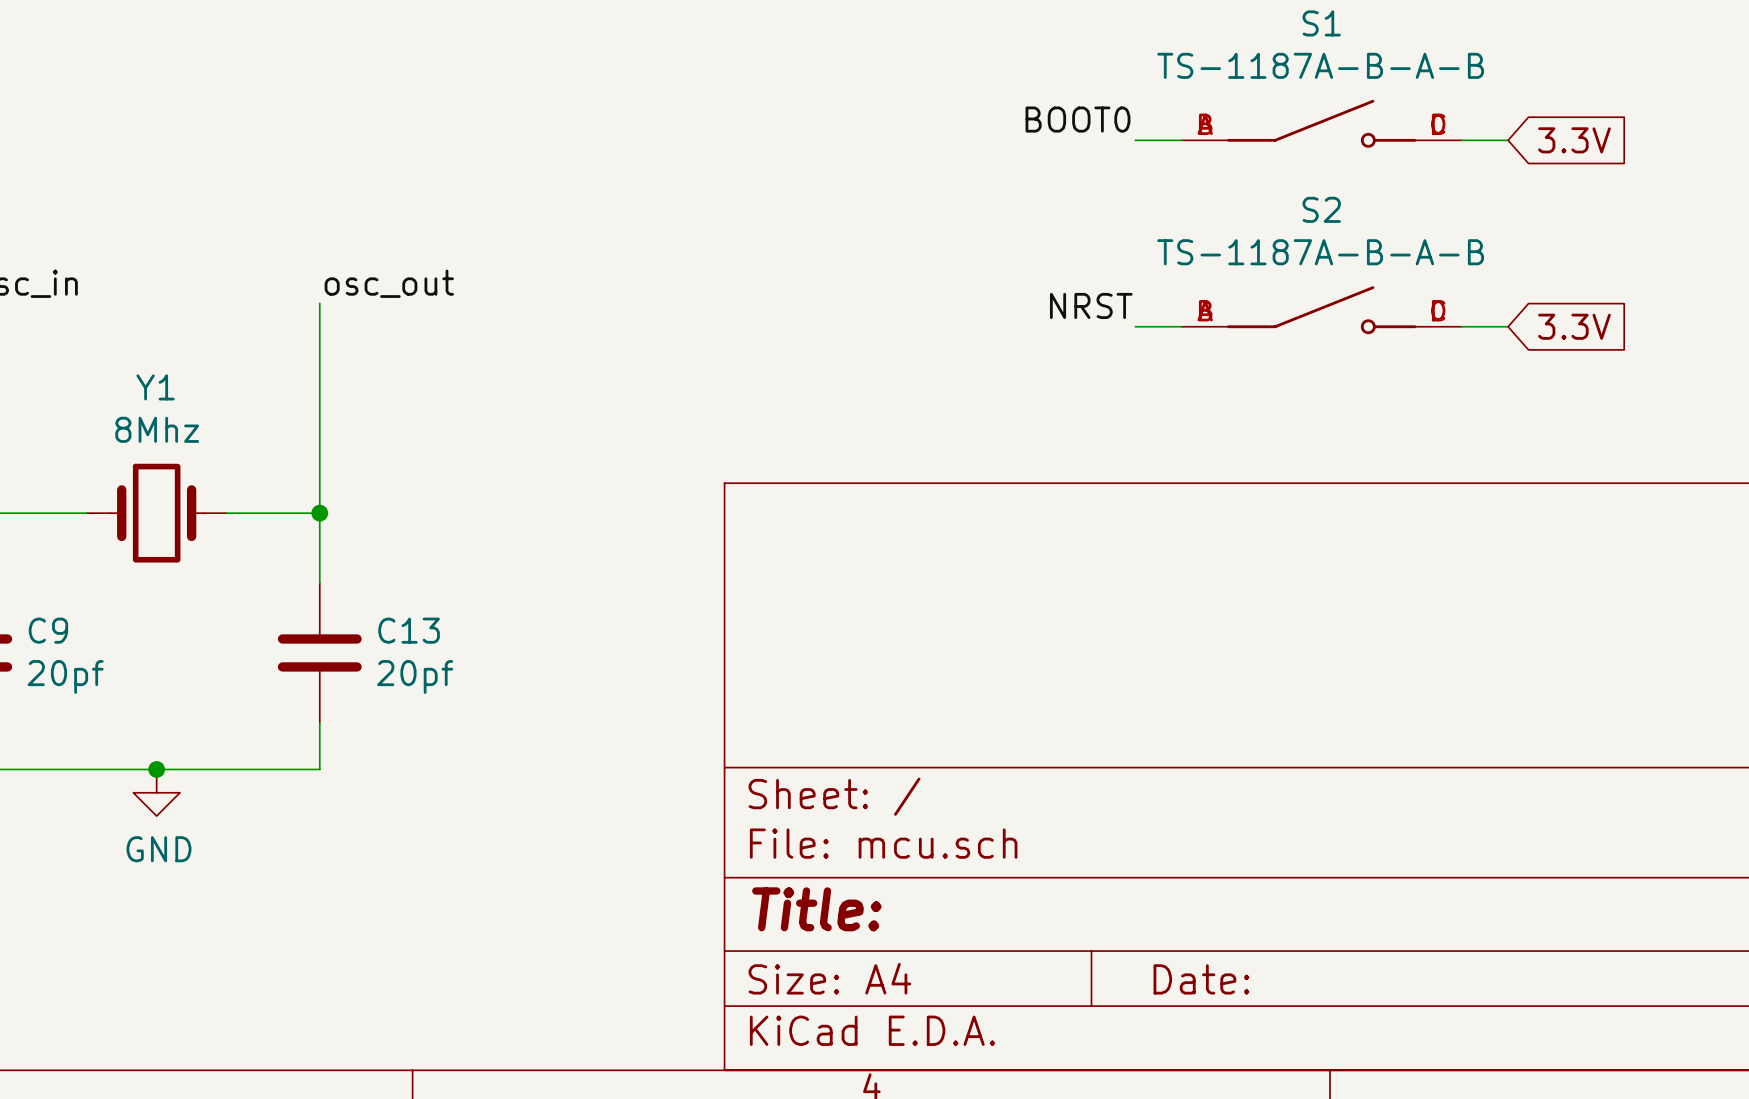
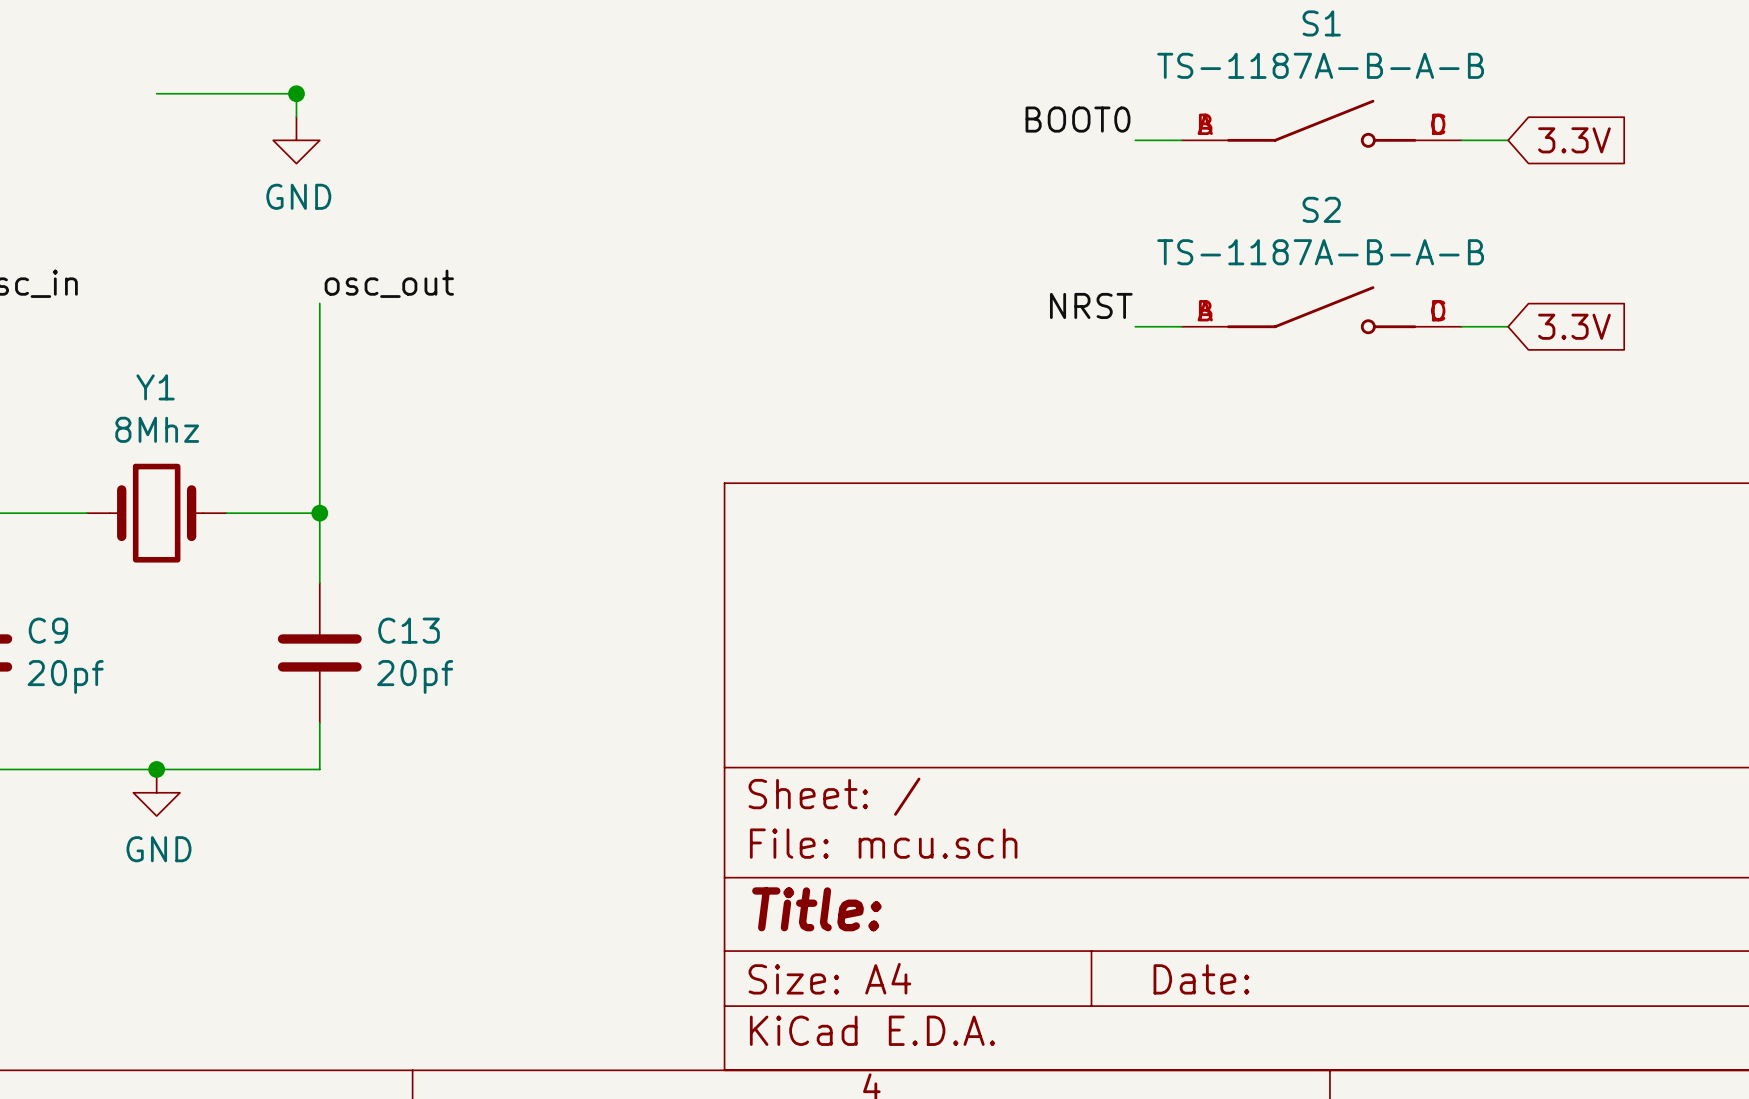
wire: none -> (156, 93) (296, 93) (296, 117)
junction: none -> (296, 93)
power symbol: none -> GND (296, 140)

